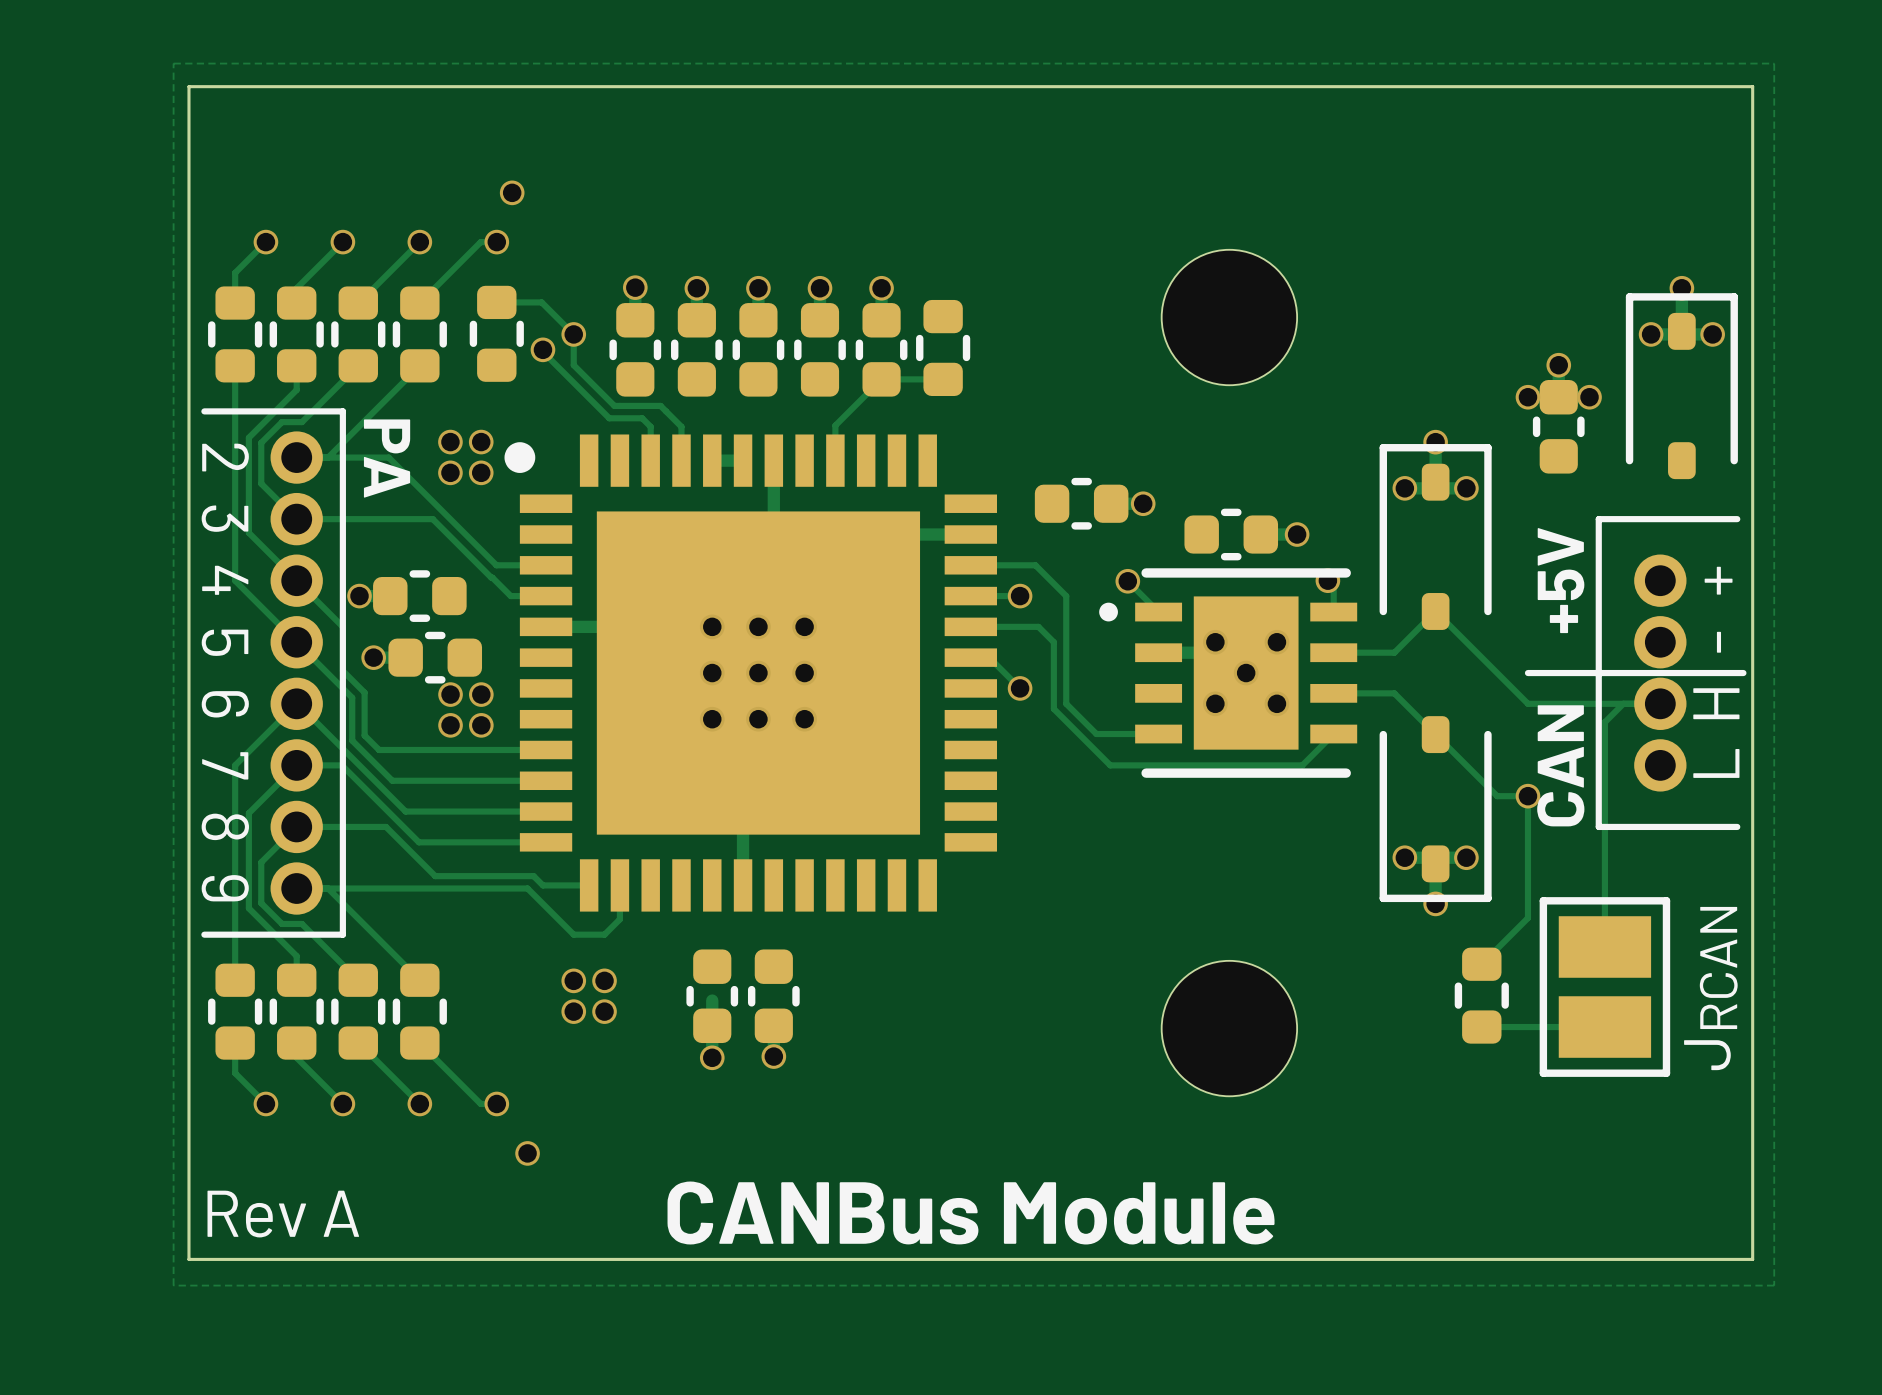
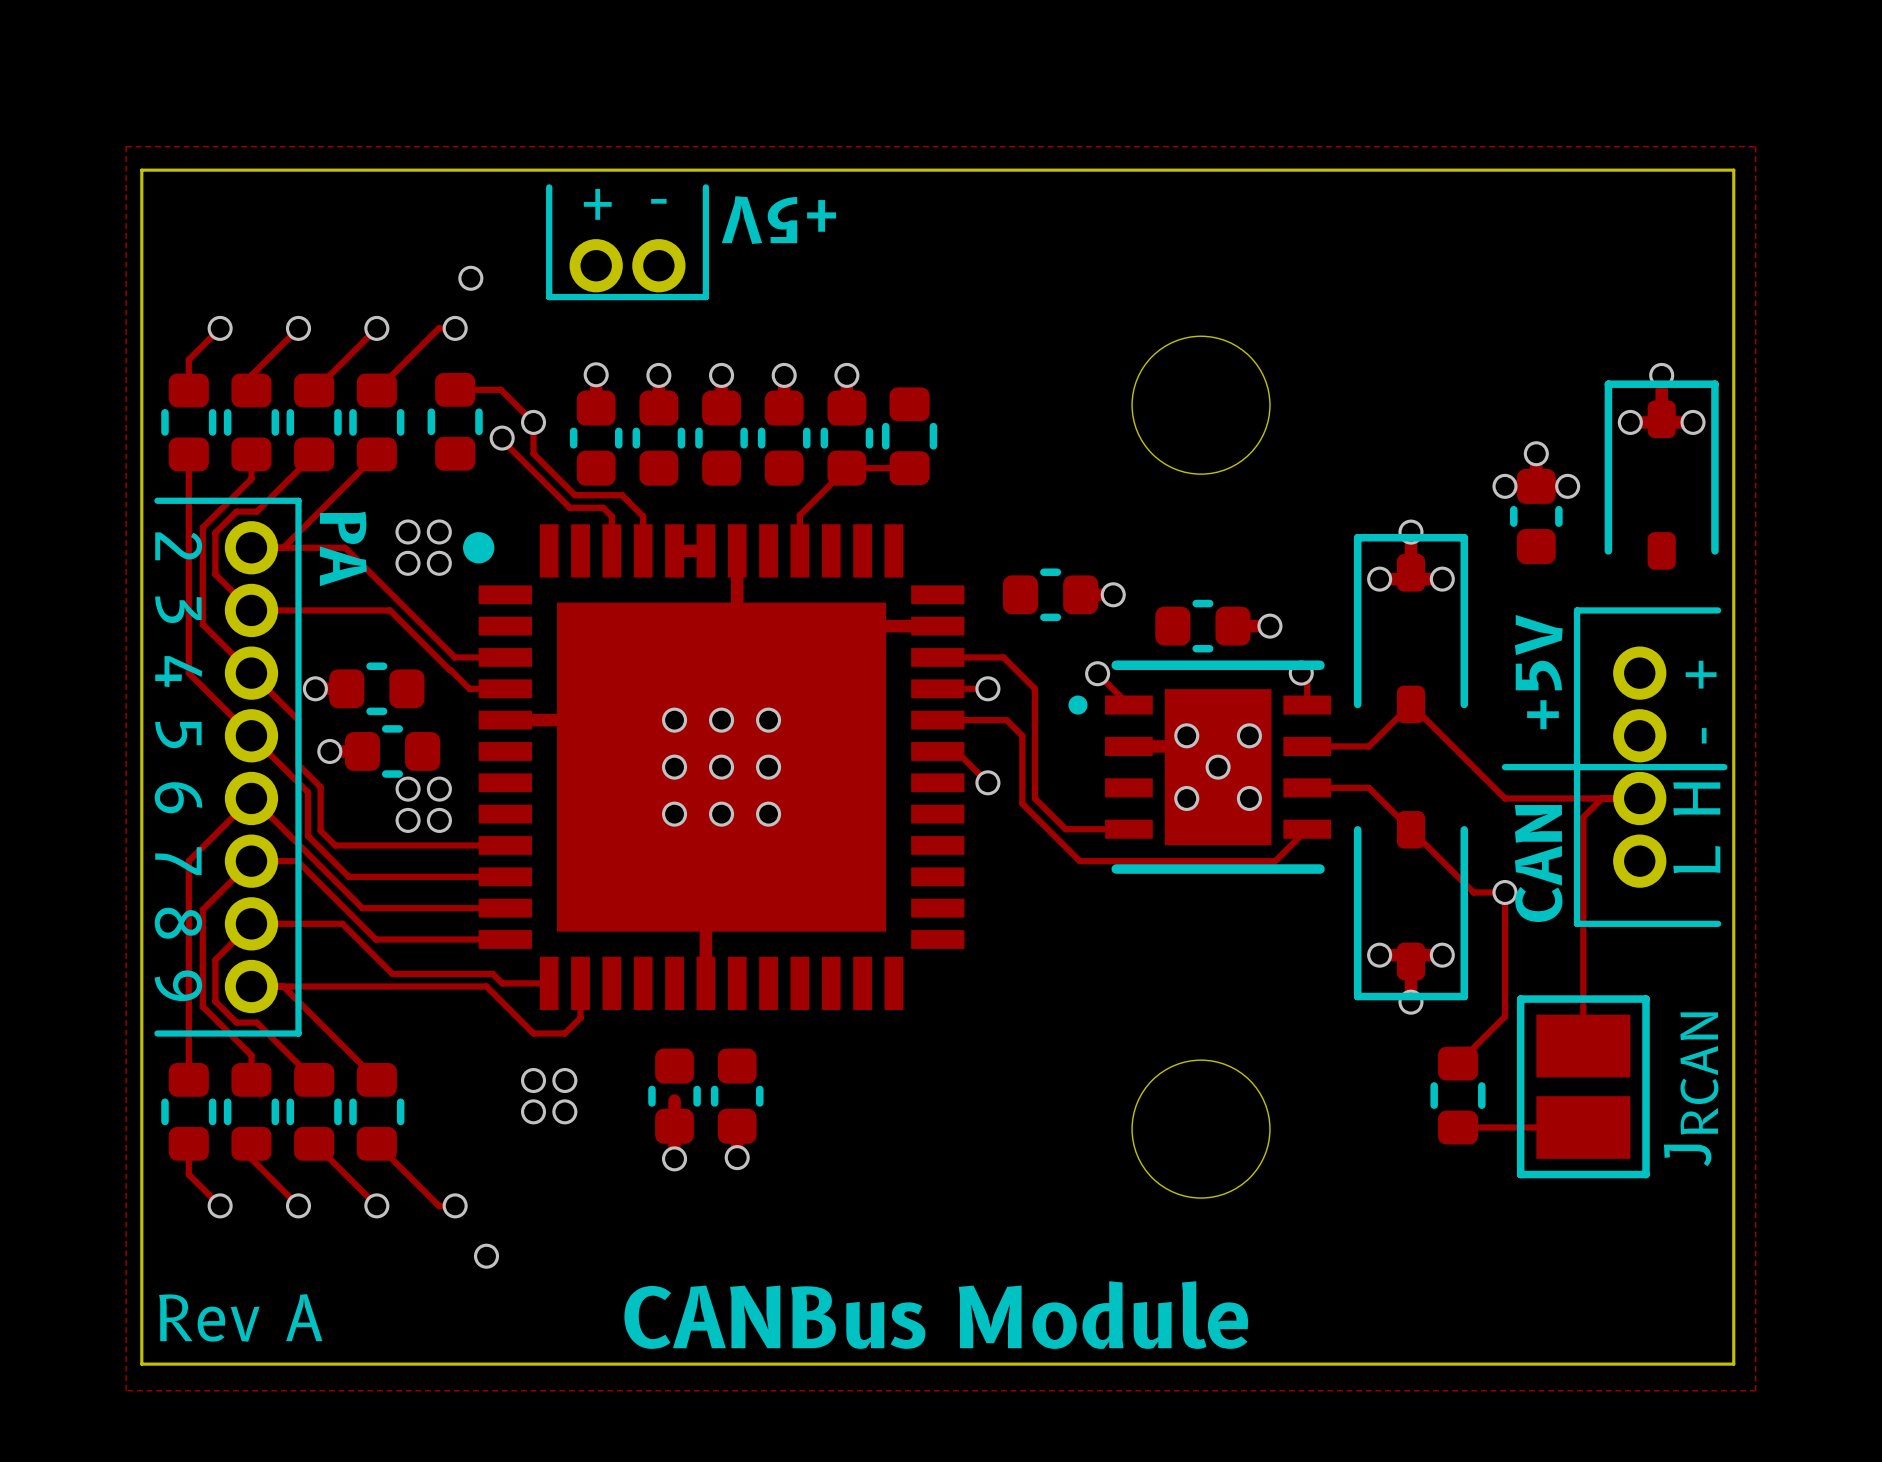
line: none -> (549, 187) (549, 297) (705, 297) (705, 187)
text: none -> - (658, 201)
text: none -> + (597, 204)
text: none -> +5V (778, 220)
part: none -> (627, 265)

